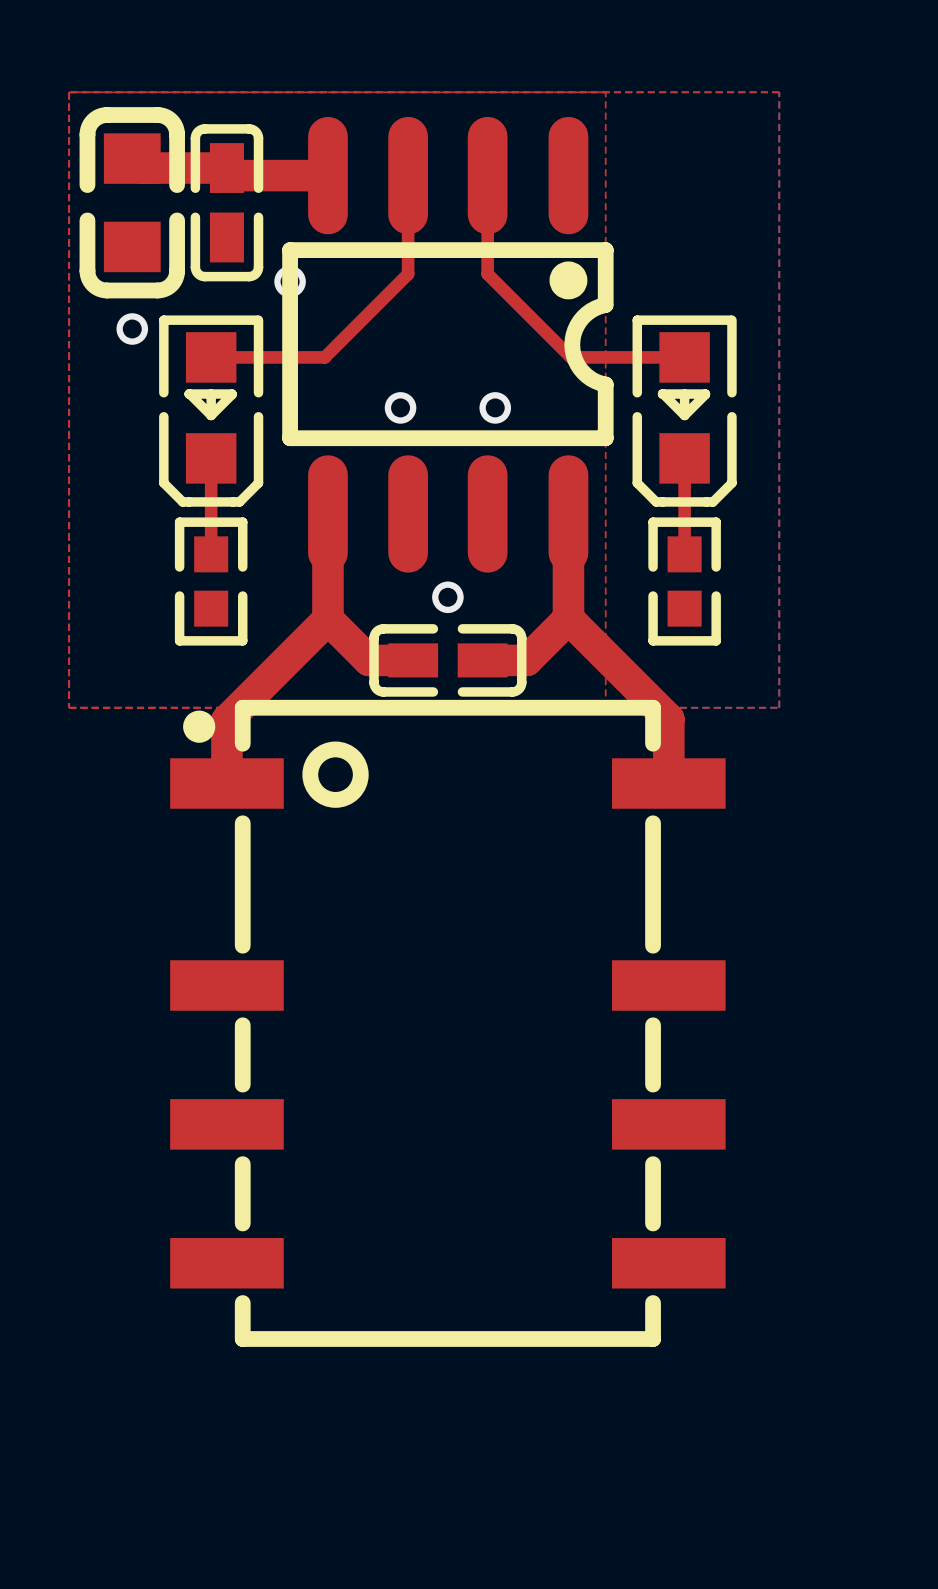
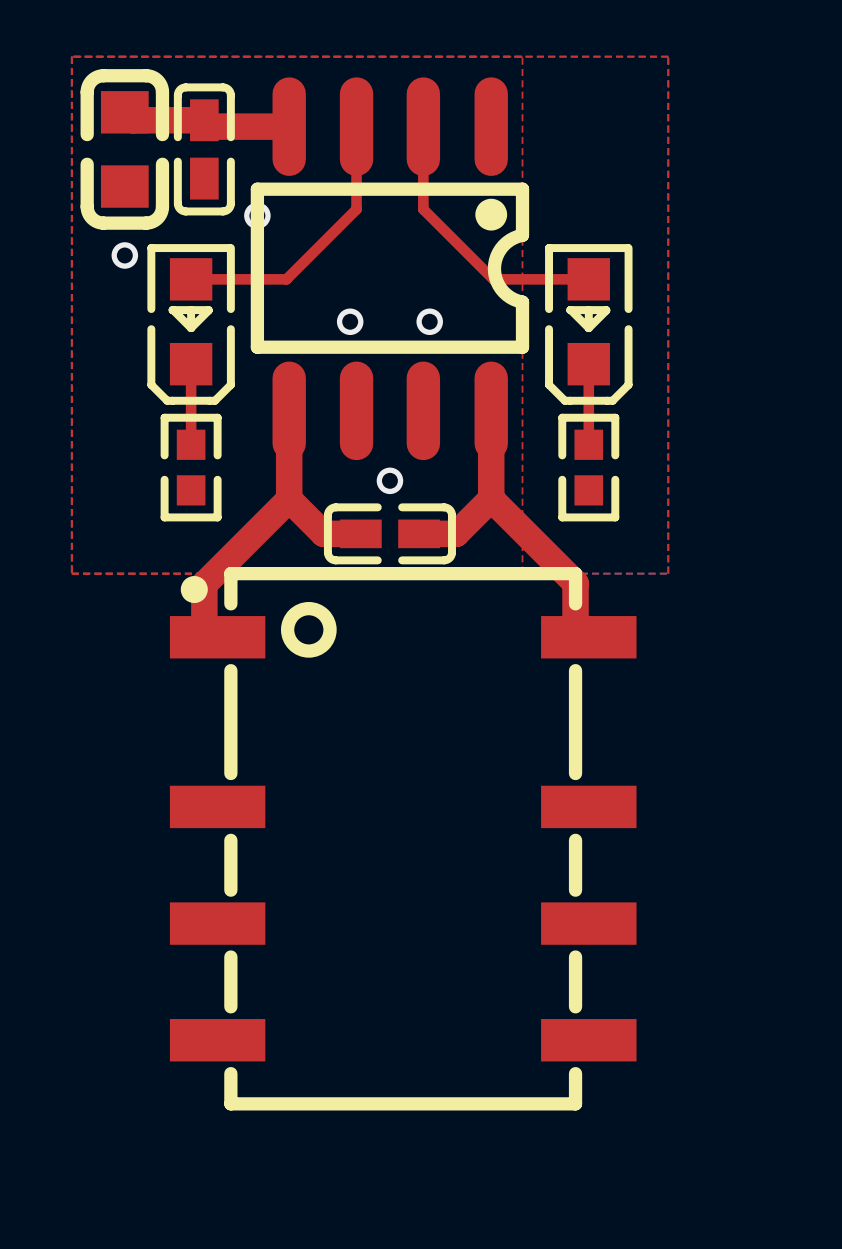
part position: (447, 1023) -> (403, 838)

